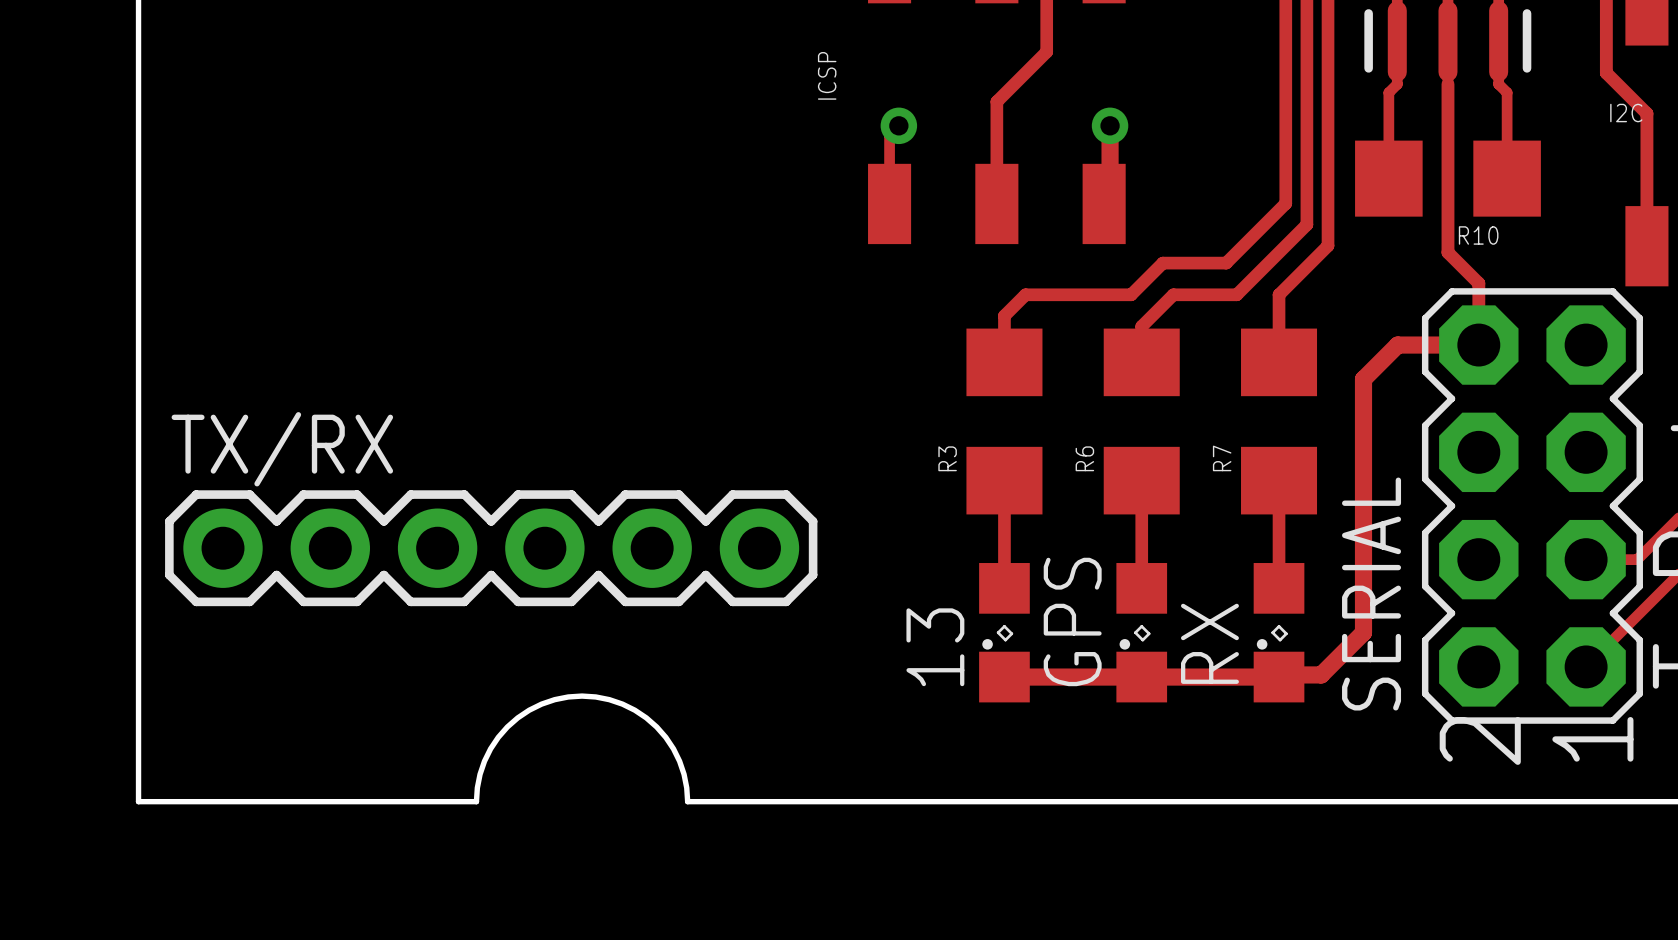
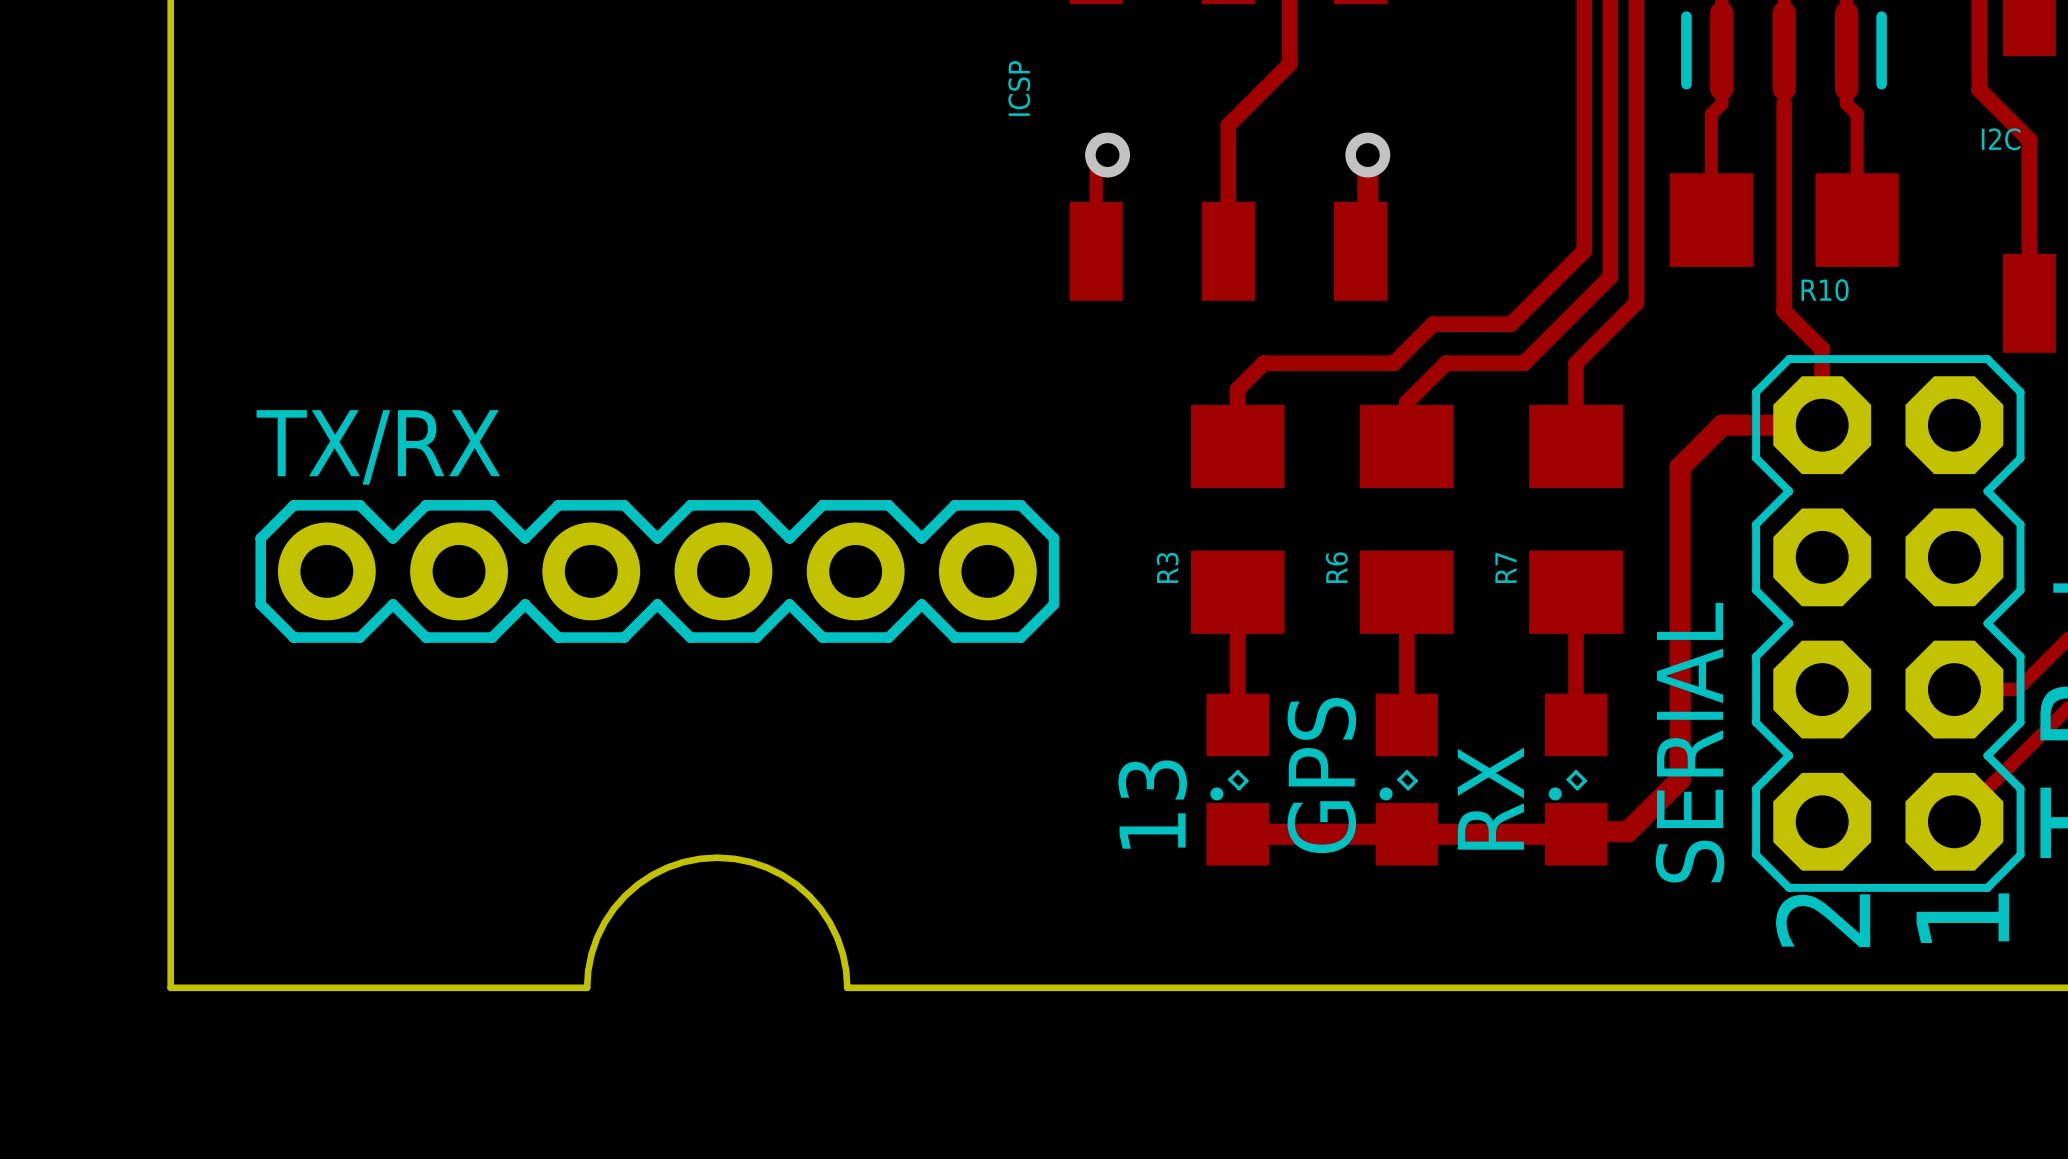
TX/RX position: (491, 548) -> (657, 571)

